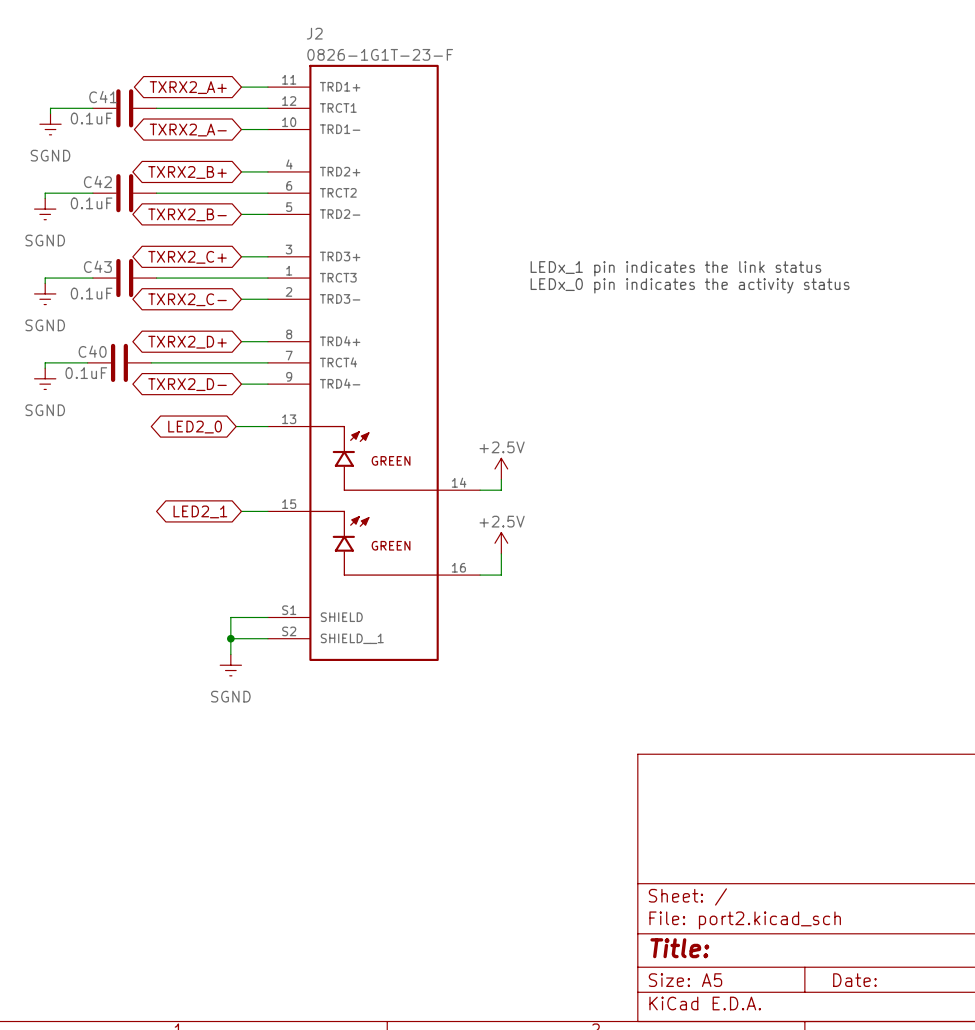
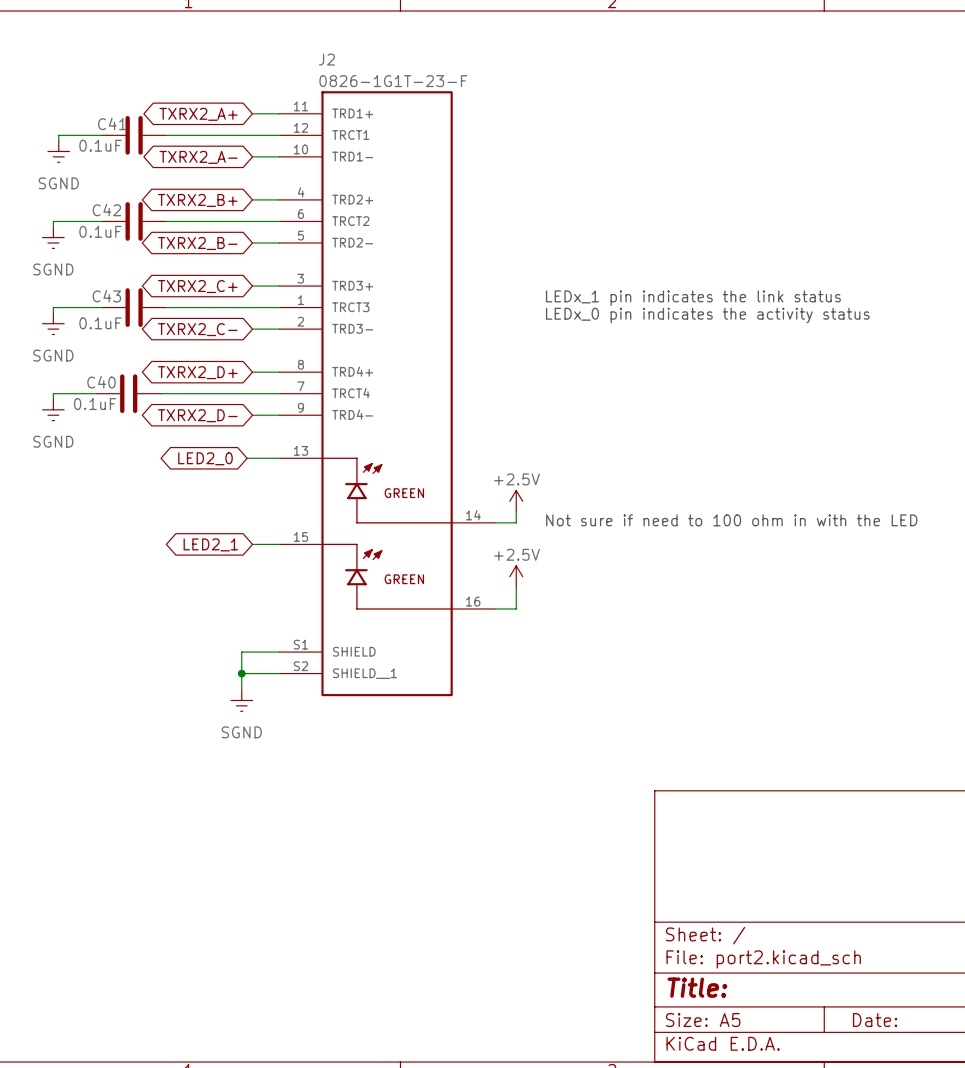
text: none -> Not sure if need to 100 ohm in with the LED (731, 520)

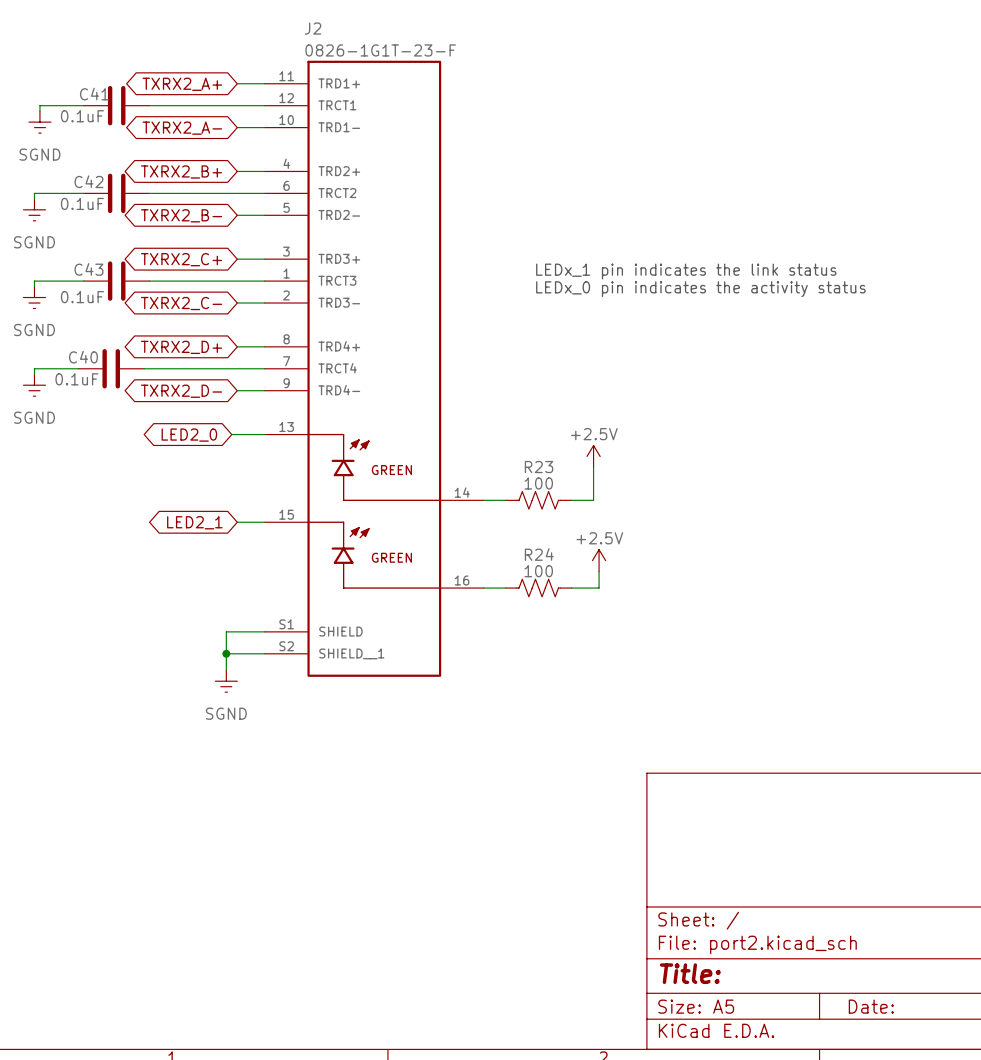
power symbol: none -> +2.5V (593, 456)
wire: none -> (593, 467) (593, 500) (571, 500)
power symbol: +2.5V (516, 501) -> none
wire: (516, 512) (516, 522) -> none
text: Not sure if need to 100 ohm in with the LED (731, 520) -> none
R23: none -> 100 (538, 500)
power symbol: +2.5V (516, 576) -> none
power symbol: none -> +2.5V (599, 560)
wire: (516, 587) (516, 608) -> none
wire: none -> (599, 571) (599, 588) (571, 588)
R24: none -> 100 (538, 588)

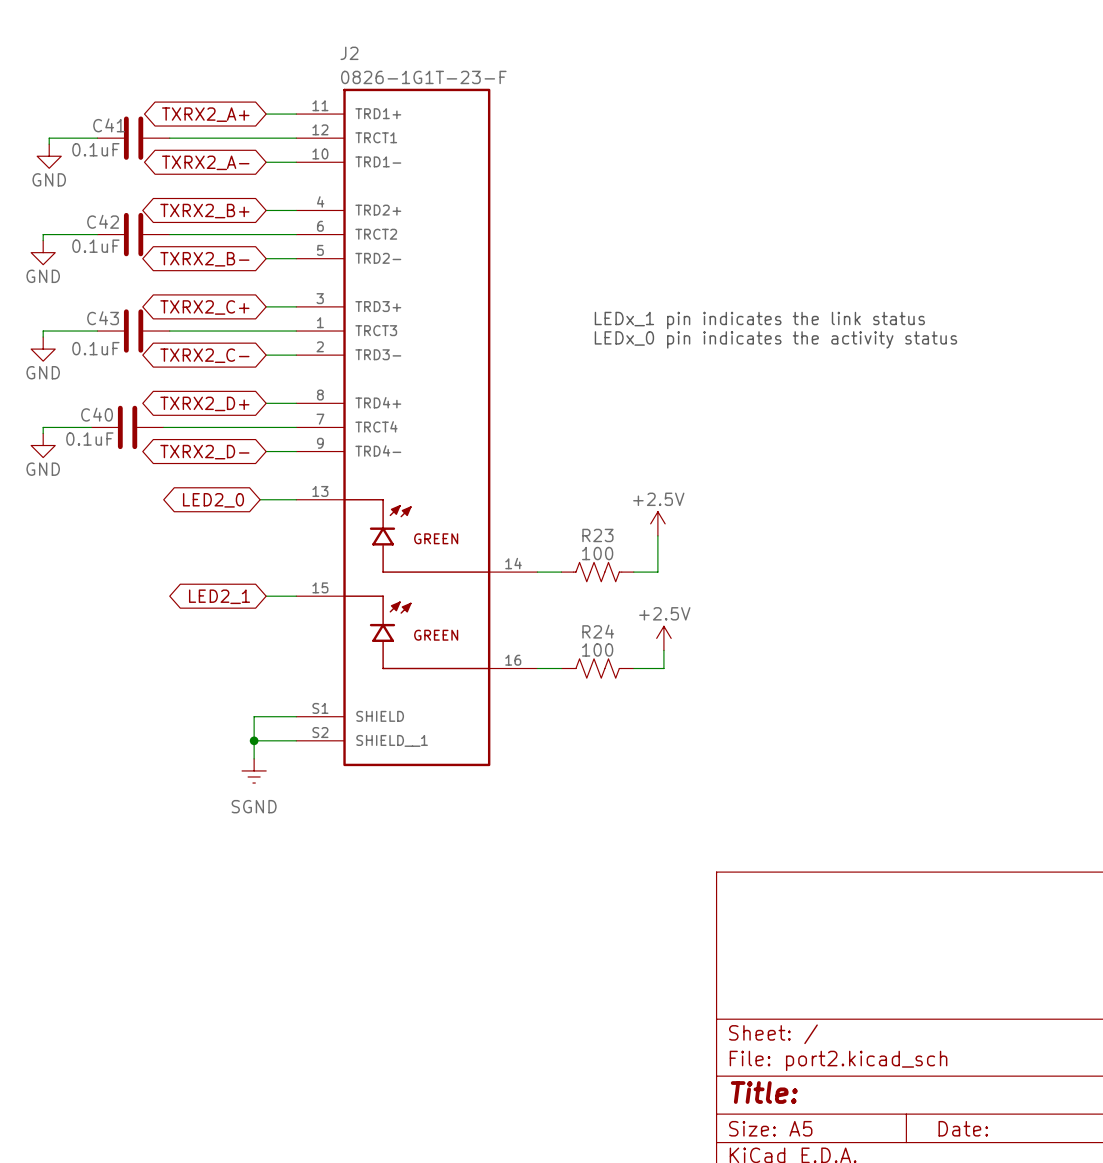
power symbol: SGND (39, 122) -> GND (49, 156)
power symbol: SGND (34, 209) -> GND (43, 252)
power symbol: SGND (34, 297) -> GND (43, 349)
power symbol: SGND (34, 385) -> GND (43, 445)

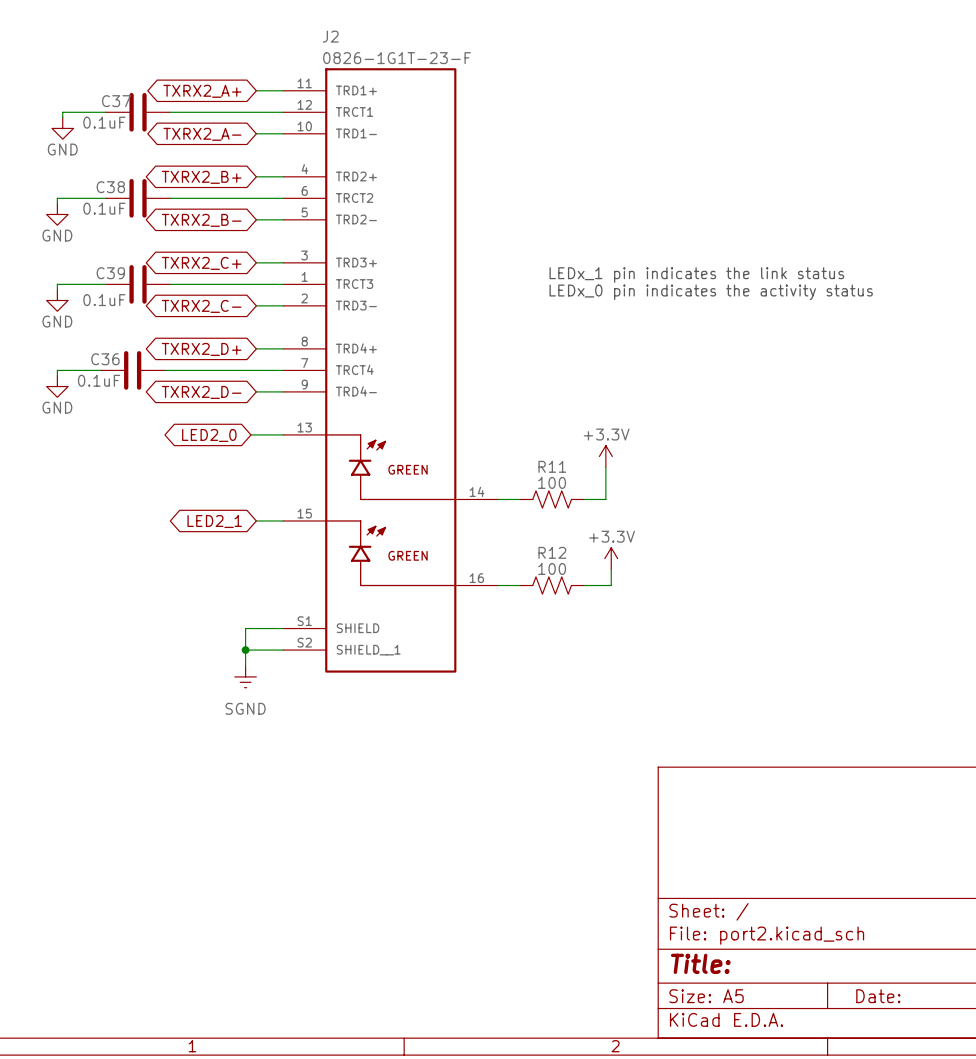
C41 name: C41 (109, 125) -> C37 (116, 101)
C42 name: C42 (103, 221) -> C38 (110, 187)
C43 name: C43 (103, 318) -> C39 (110, 273)
C40 name: C40 (97, 414) -> C36 (105, 359)
power symbol: +2.5V (657, 523) -> +3.3V (605, 456)
R23 name: R23 (597, 535) -> R11 (552, 466)
R24 name: R24 (598, 631) -> R12 (552, 552)
power symbol: +2.5V (663, 638) -> +3.3V (611, 558)

